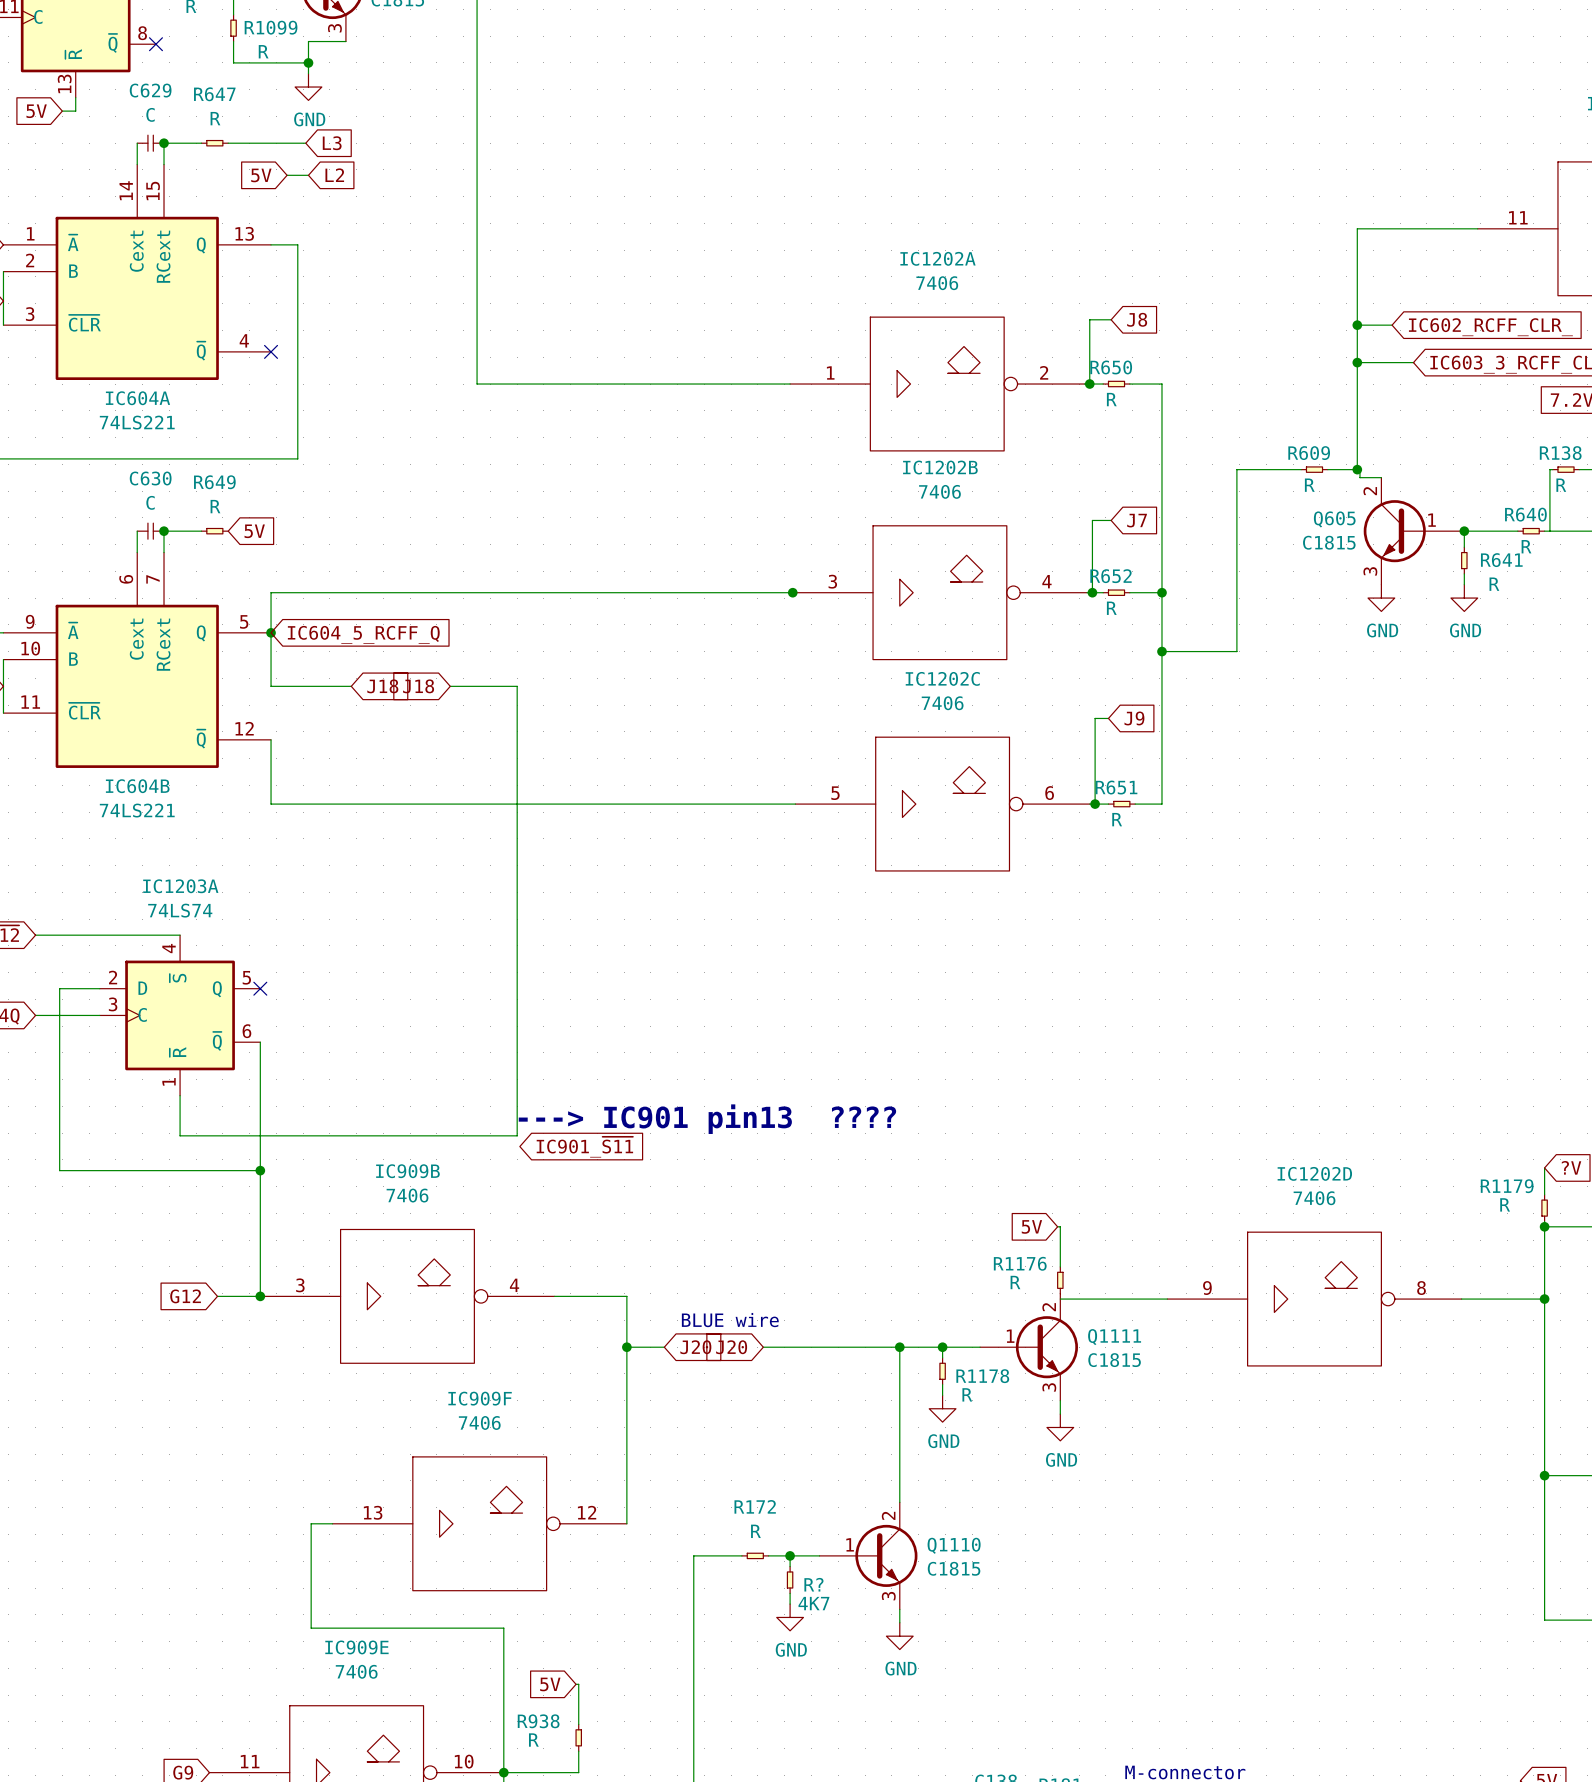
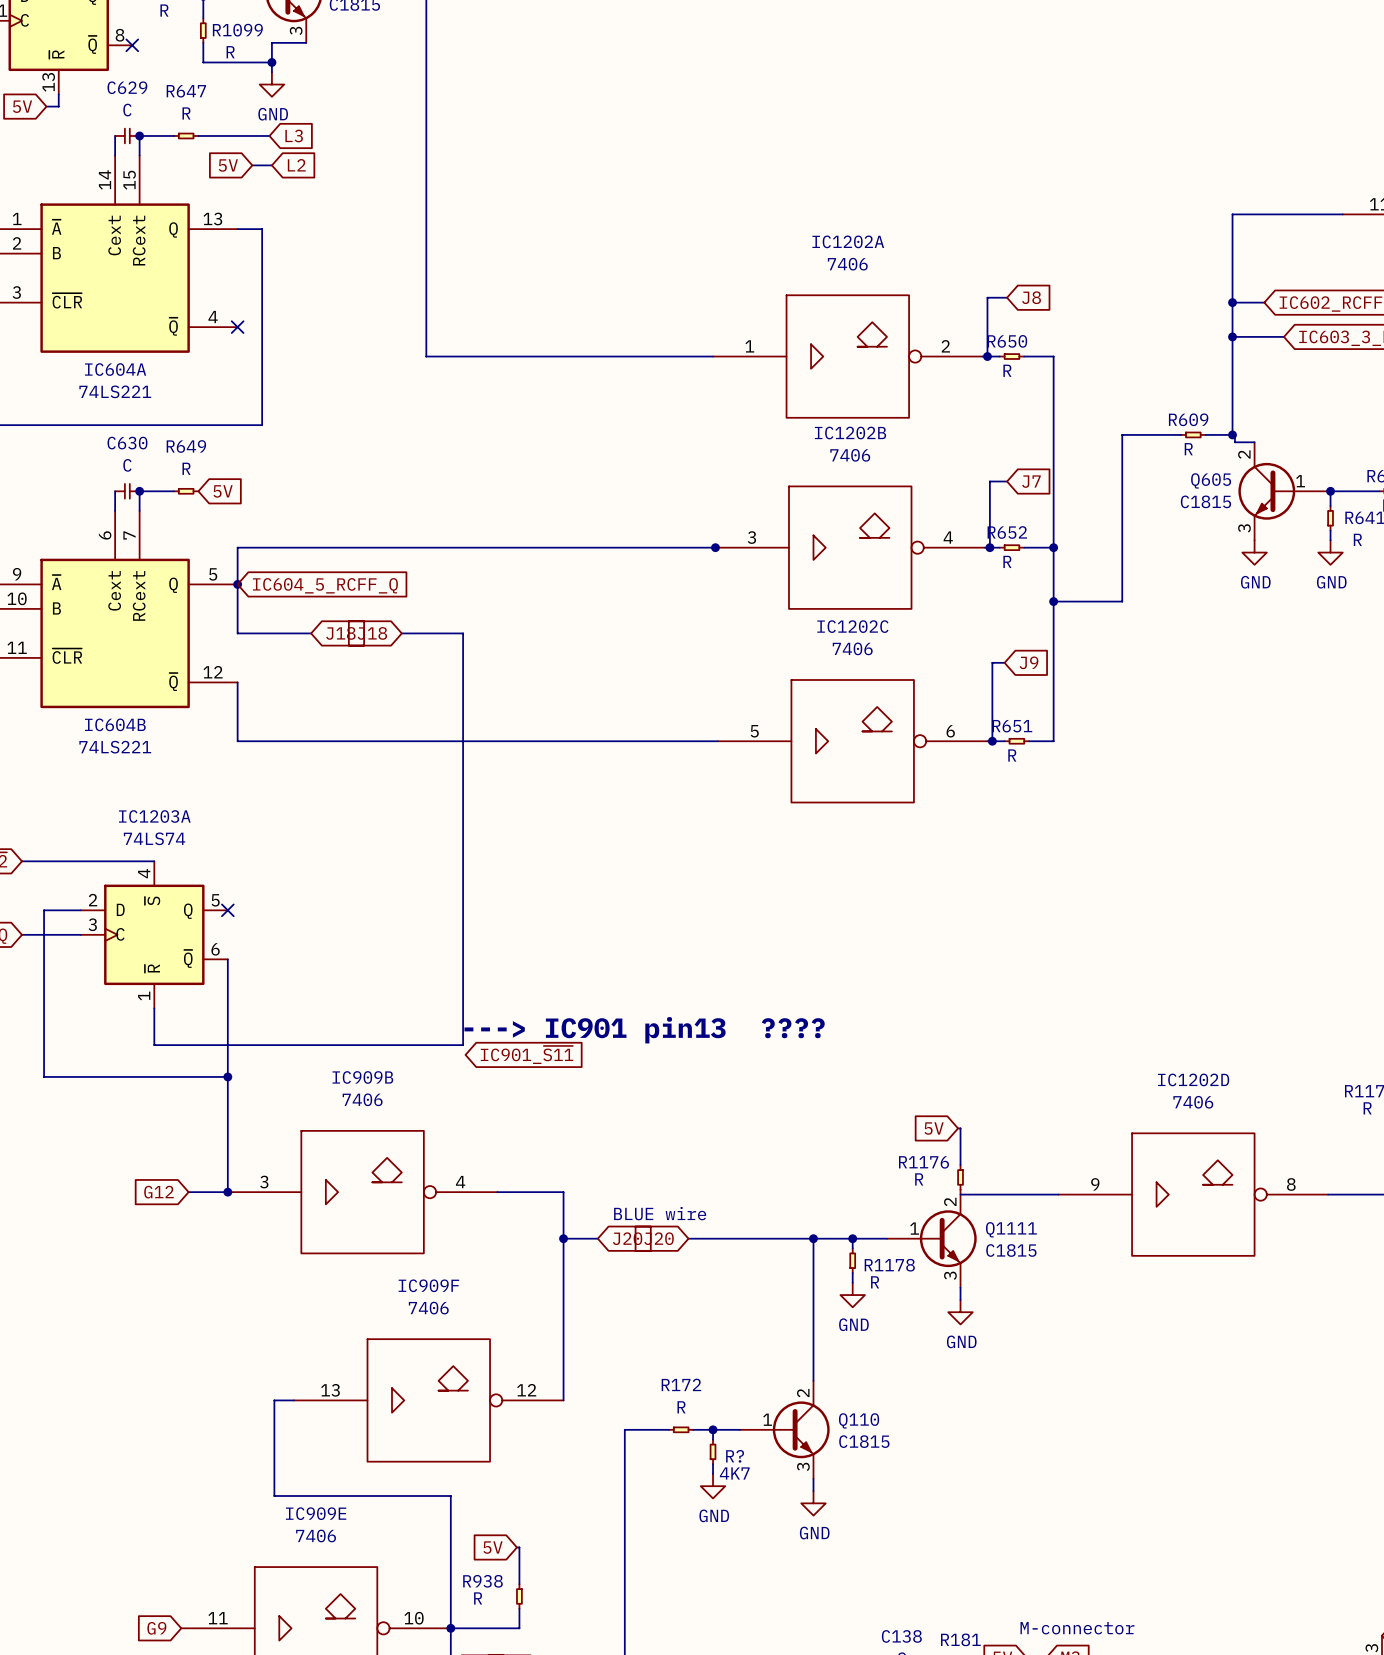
Q1110 name: Q1110 (954, 1545) -> Q110 (859, 1420)

